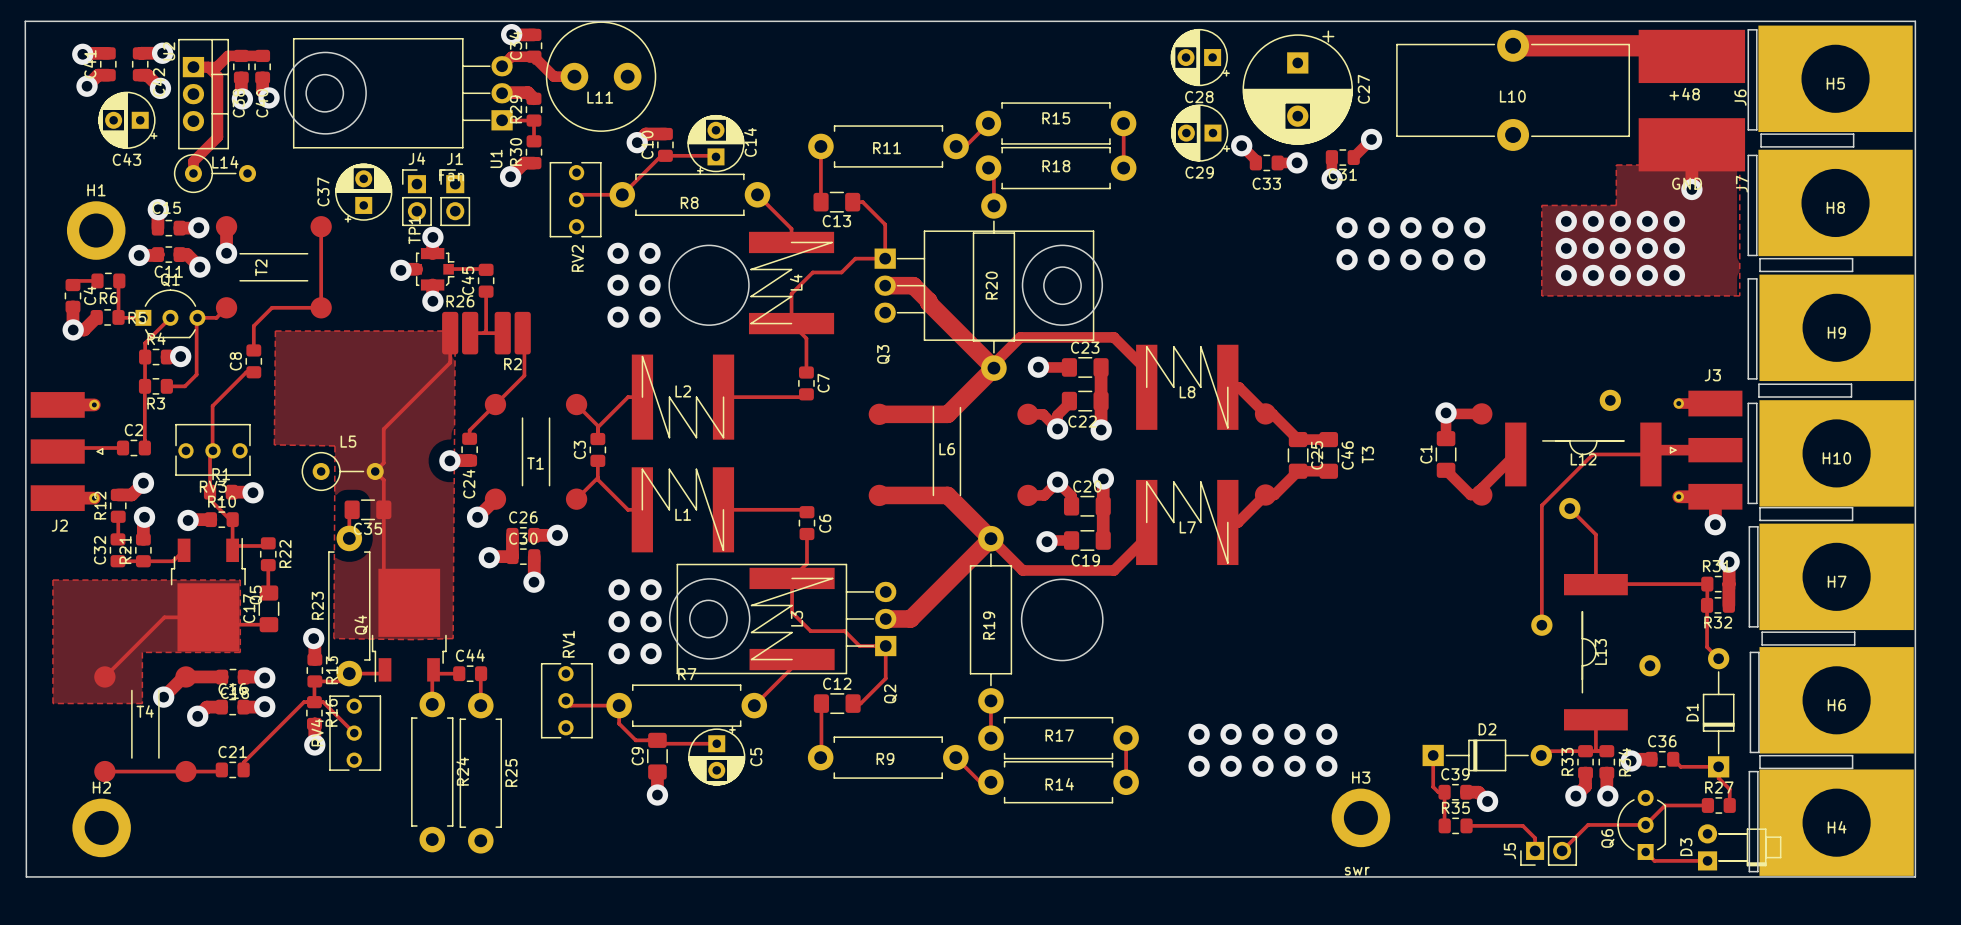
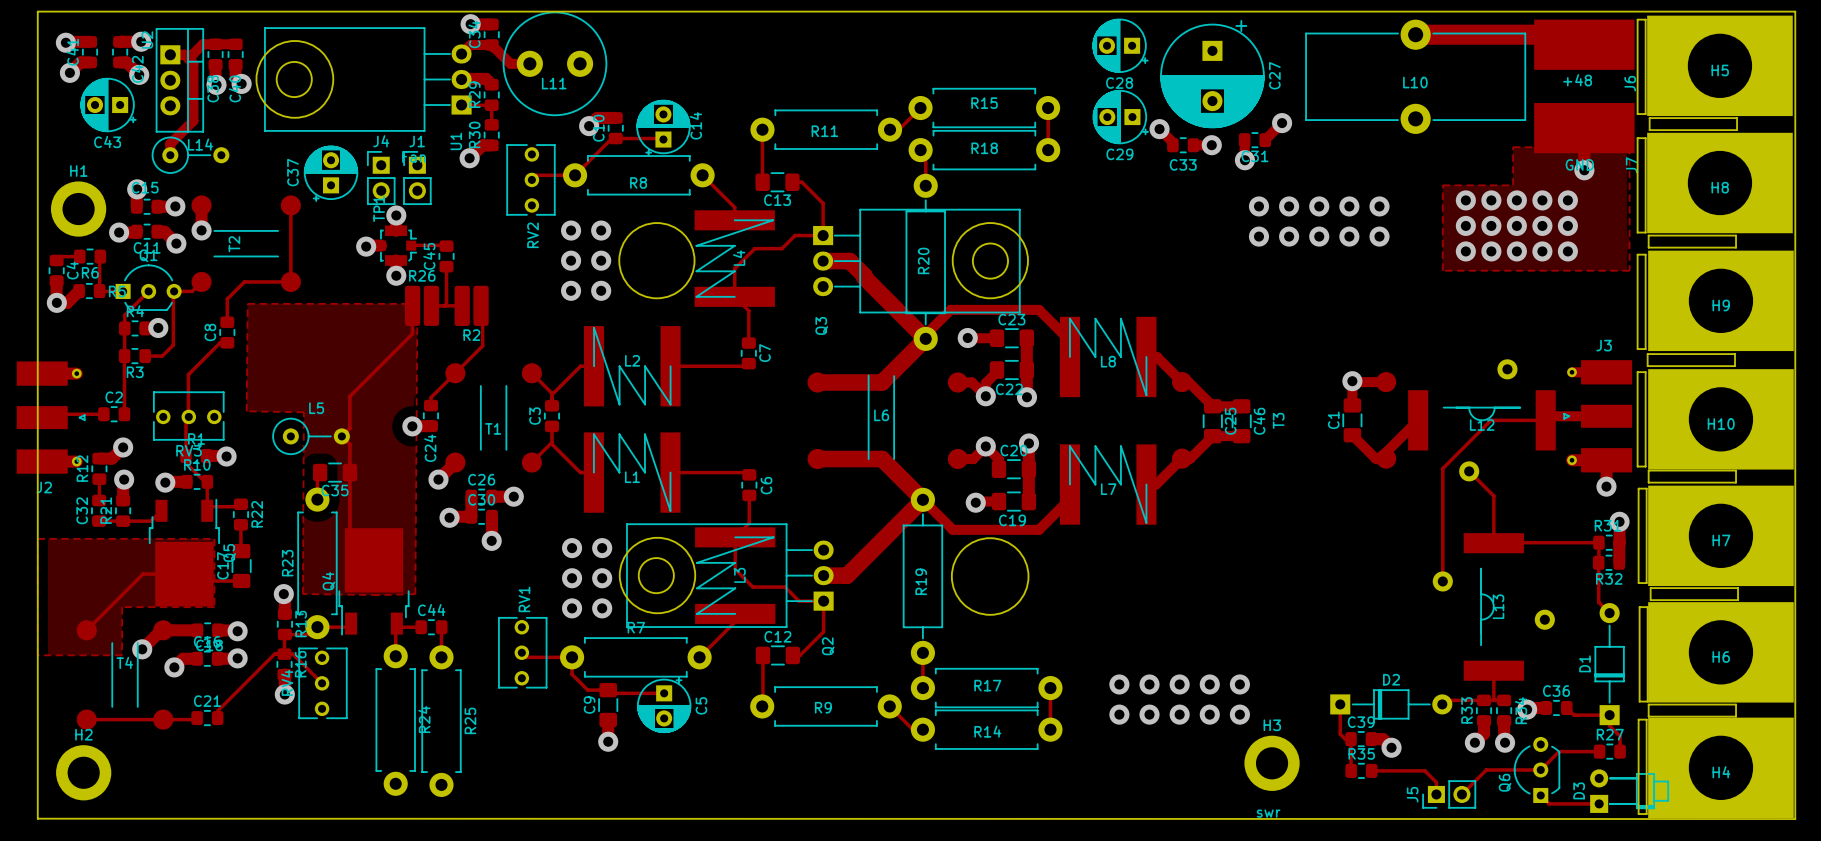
board edge: (52, 21) (25, 21) (26, 876) (1915, 876) -> (37, 11) (37, 818) (1795, 819)

